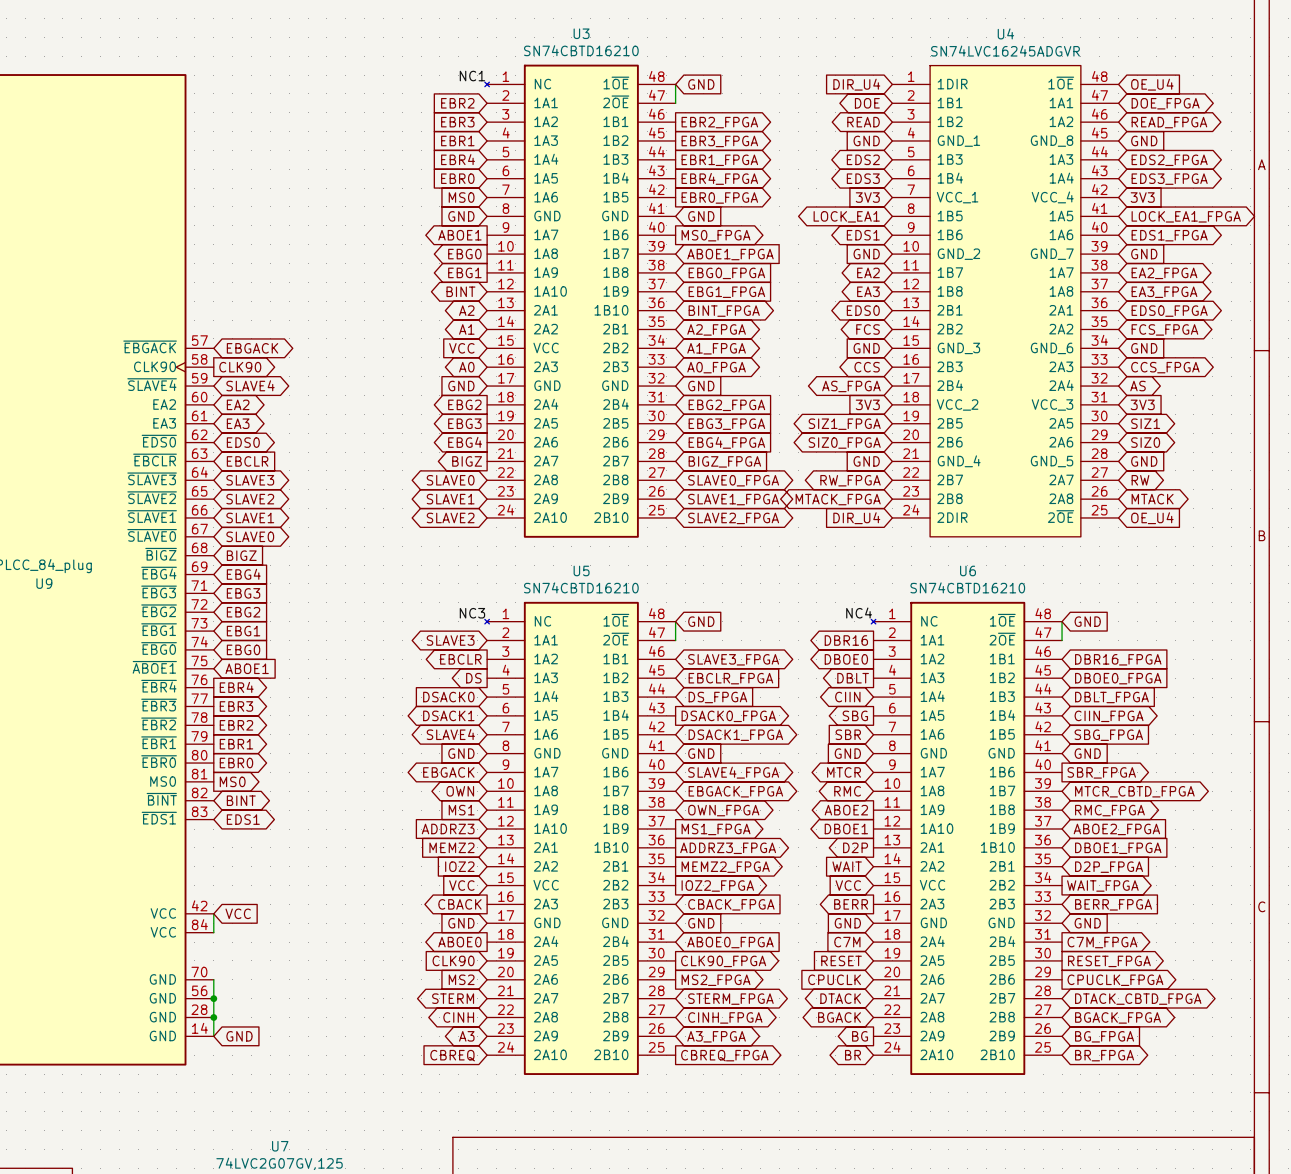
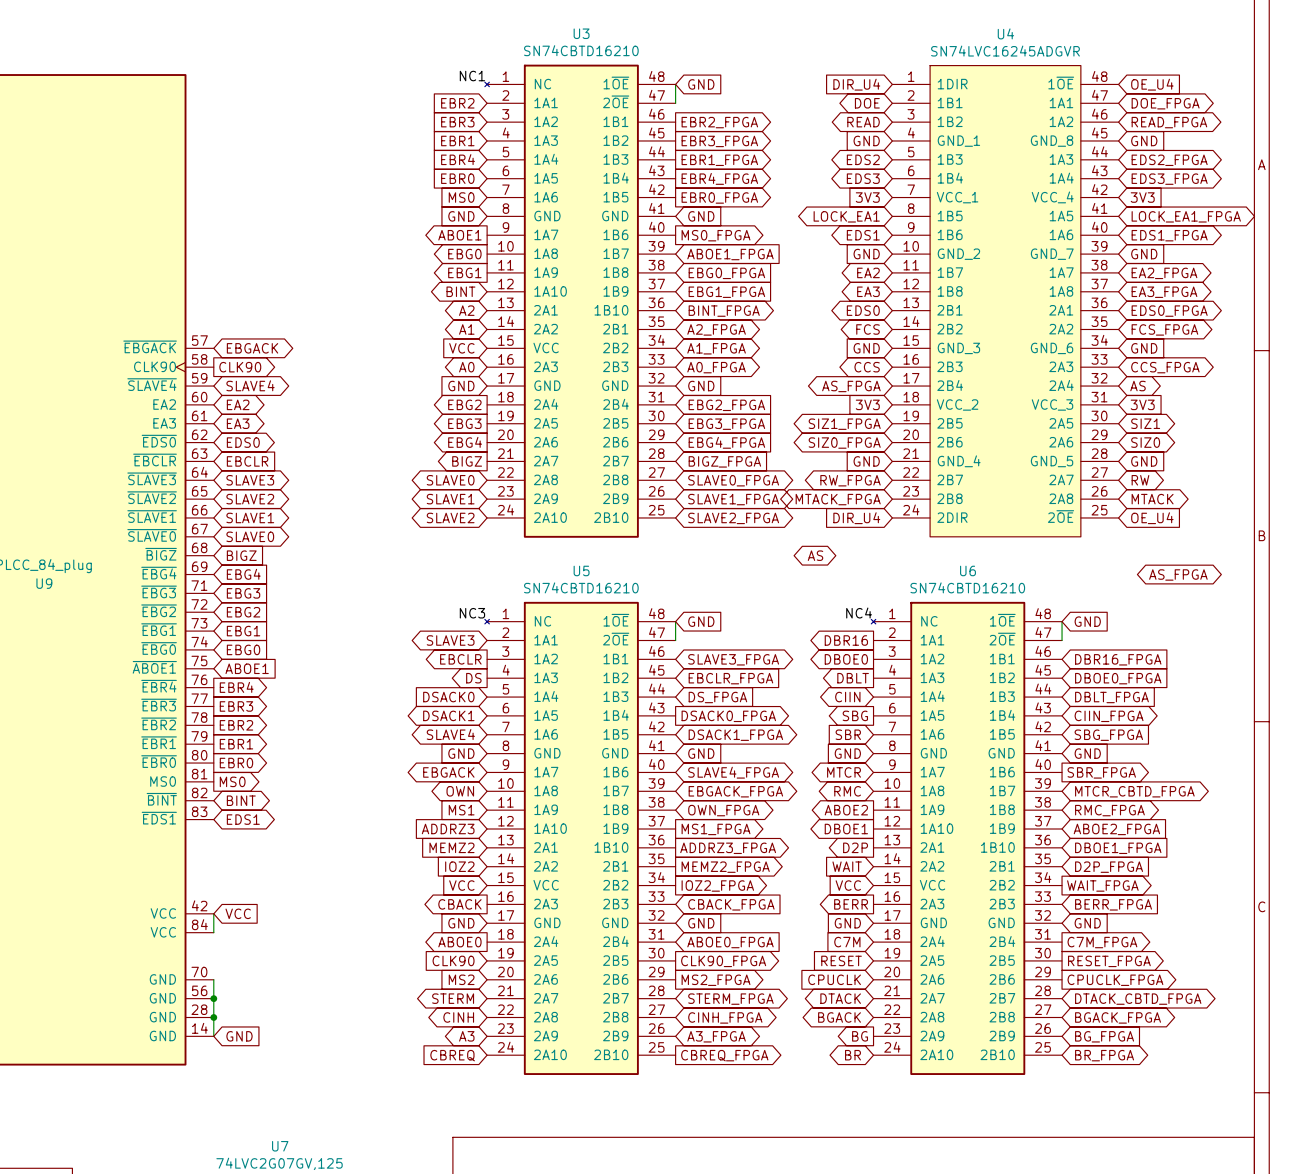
global label: none -> AS (815, 555)
global label: none -> AS_FPGA (1178, 574)

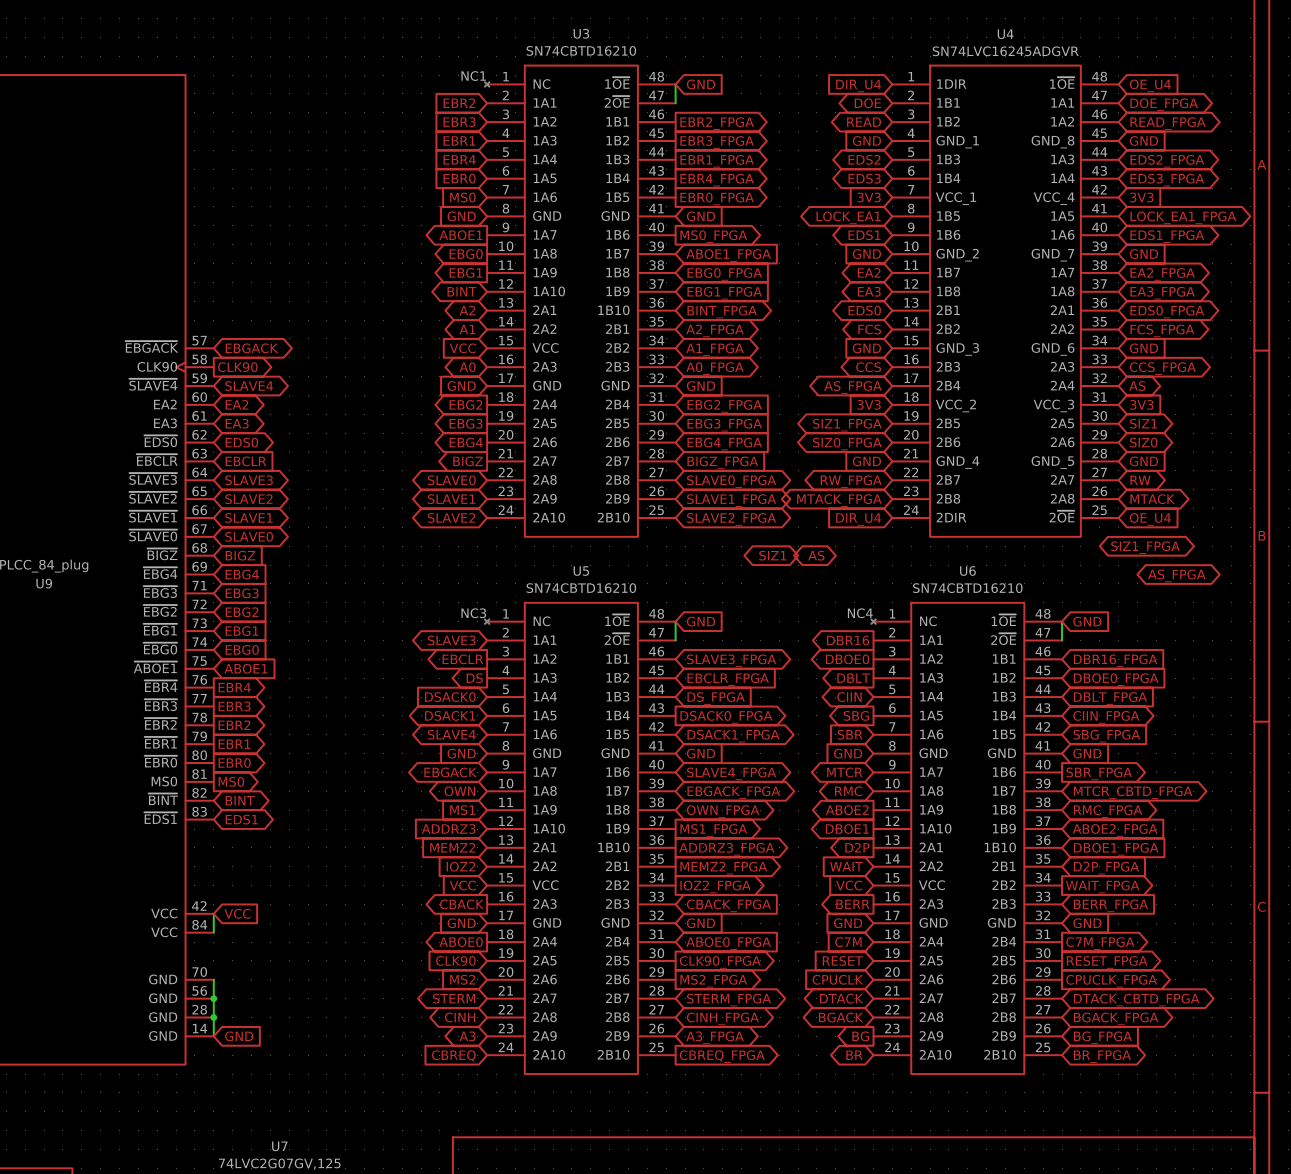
global label: none -> SIZ1_FPGA (1145, 547)
global label: none -> SIZ1 (772, 555)

